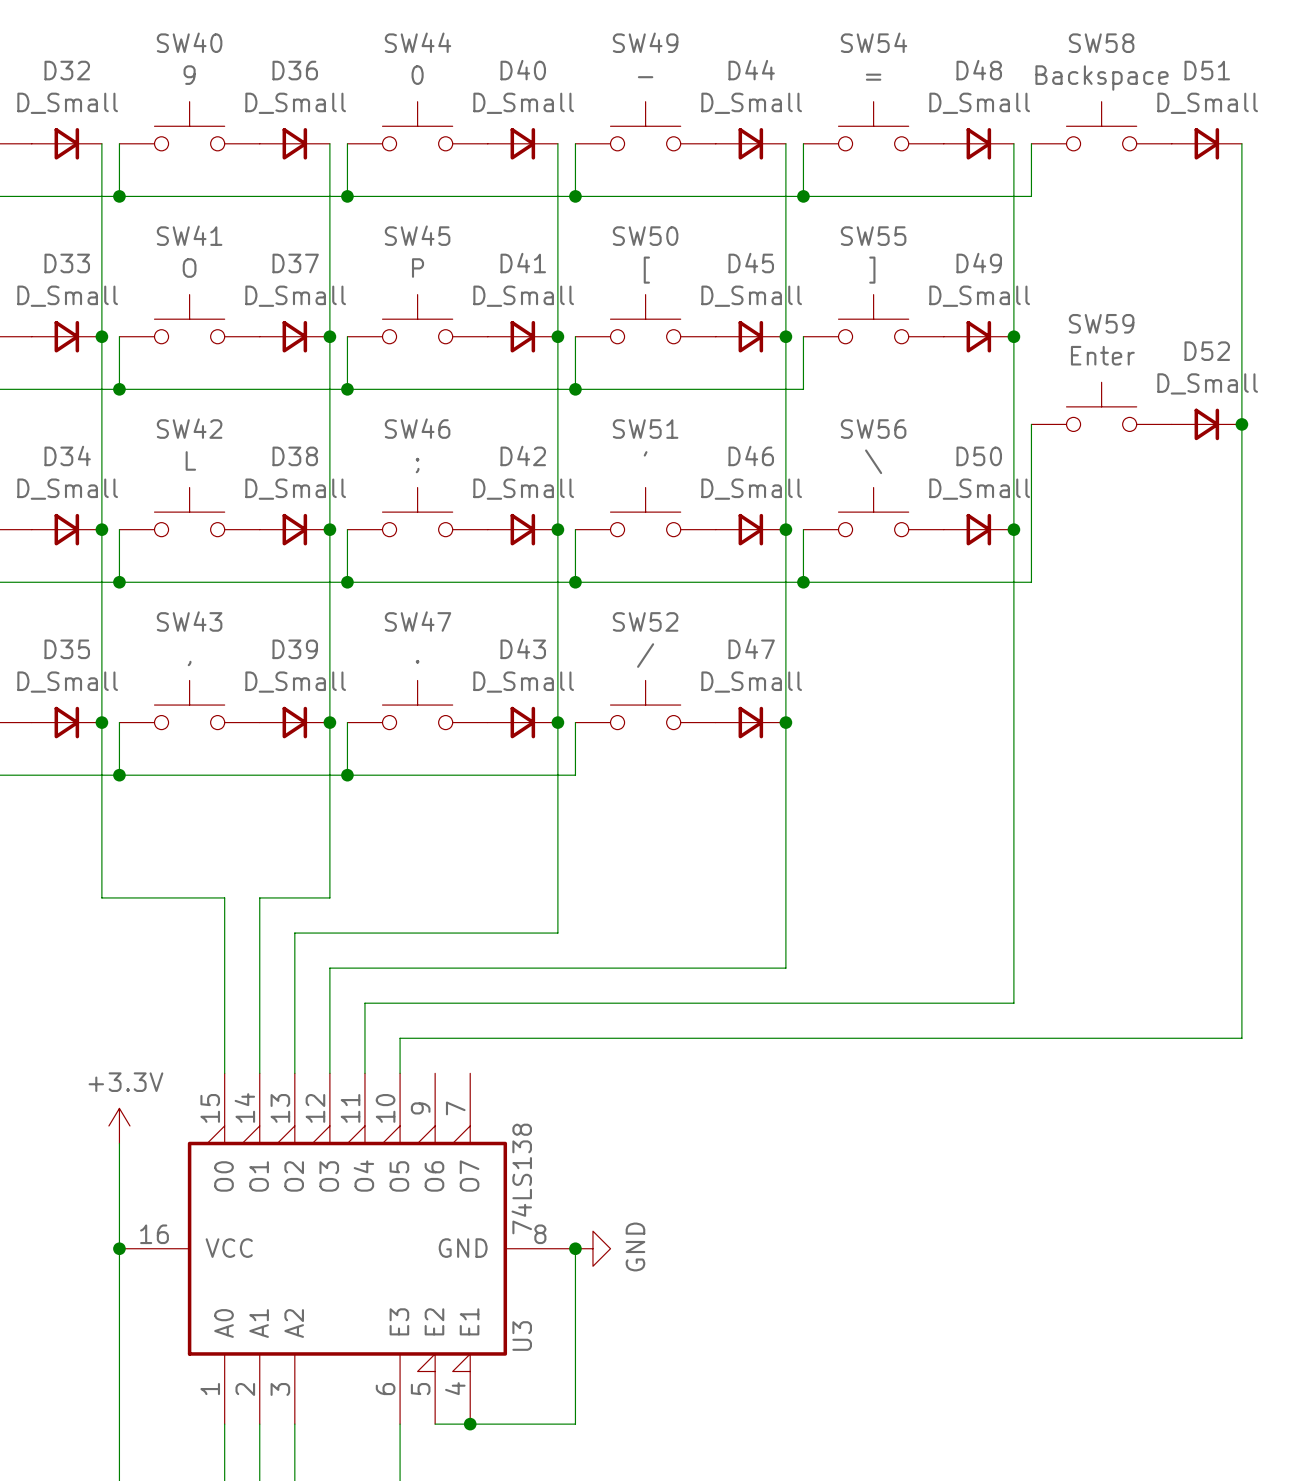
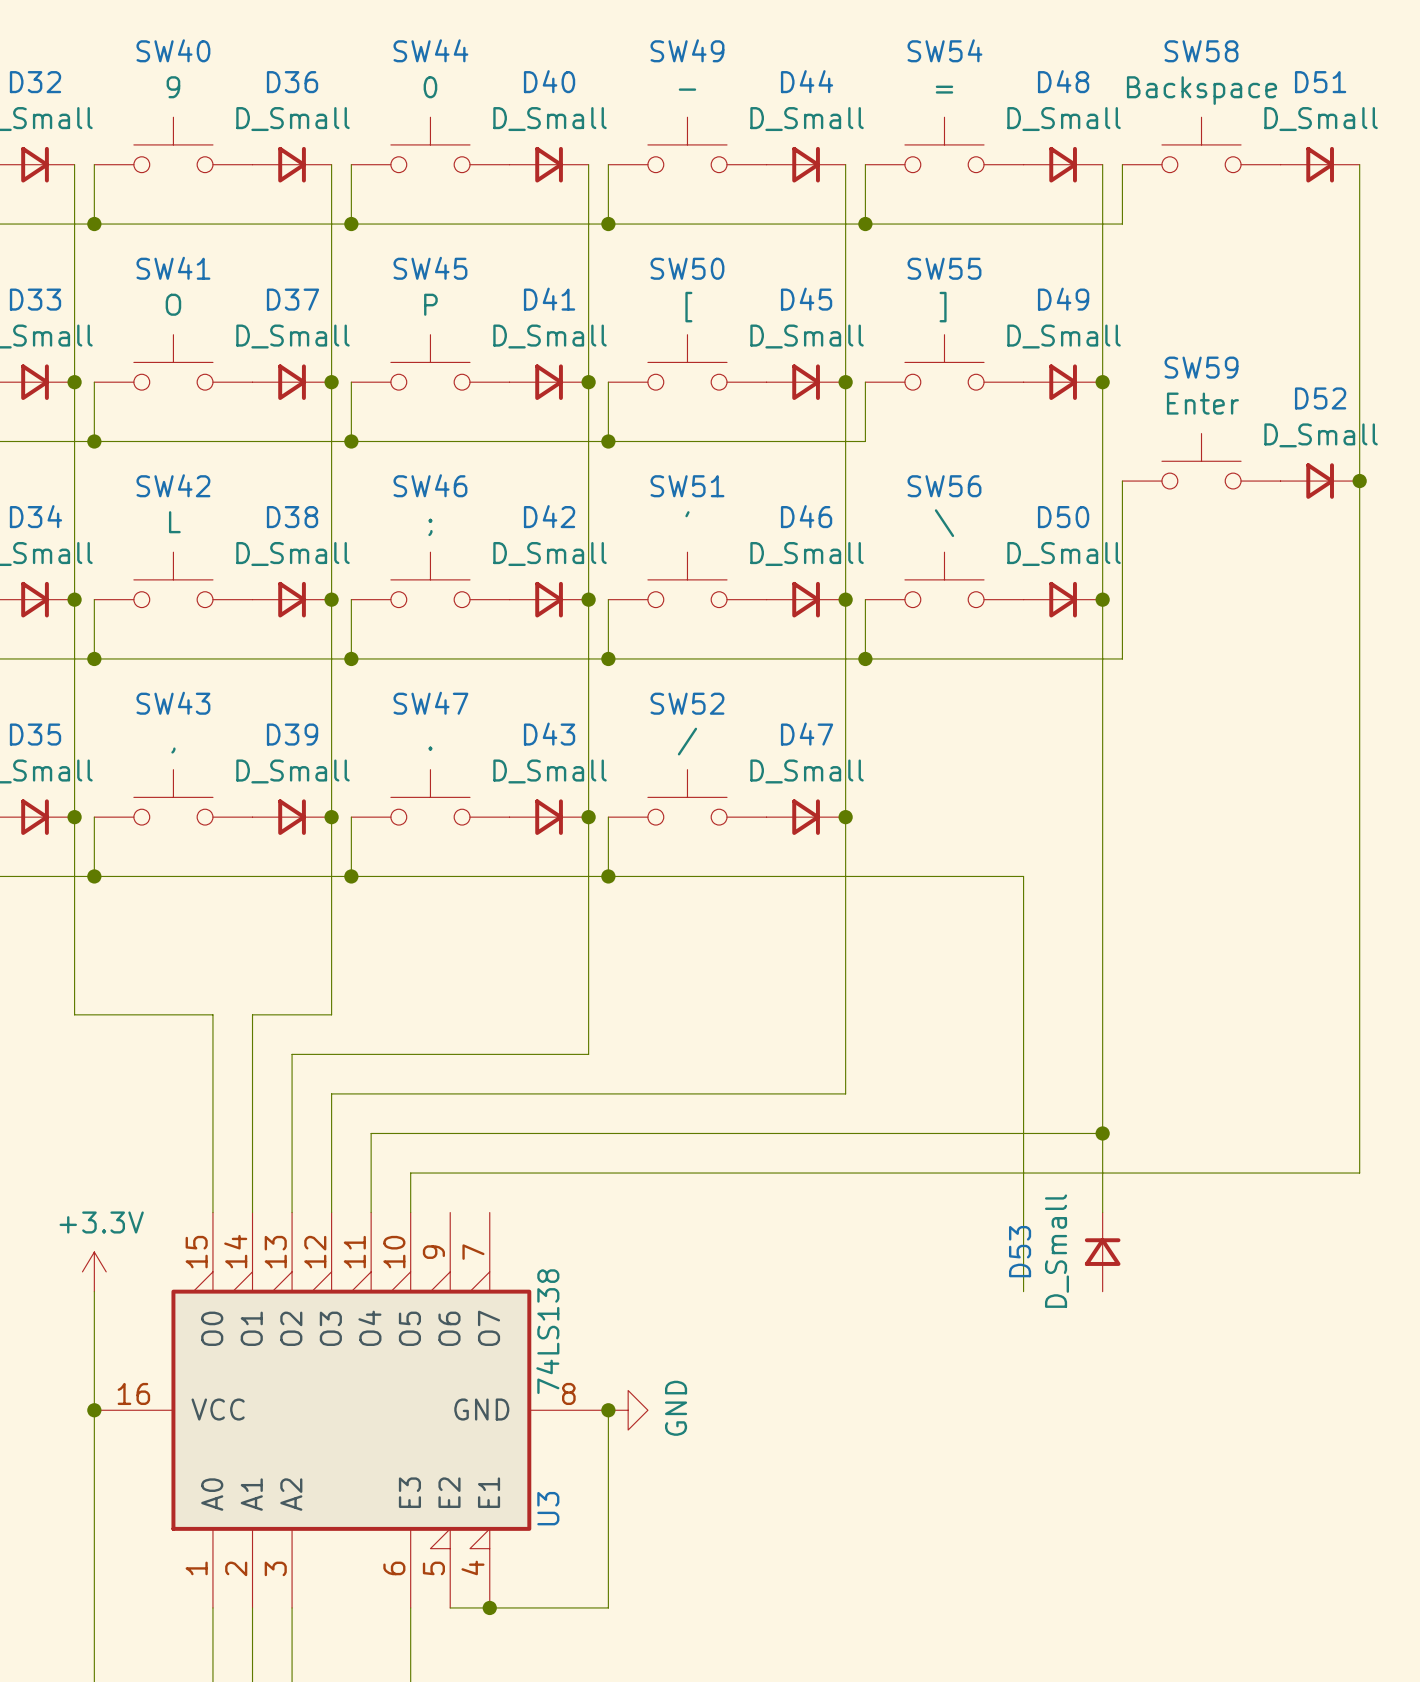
wire: none -> (608, 876) (1023, 876) (1023, 1291)
junction: none -> (608, 876)
wire: none -> (1102, 1133) (1102, 1212)
junction: none -> (1102, 1133)
D53: none -> D_Small (1102, 1252)

